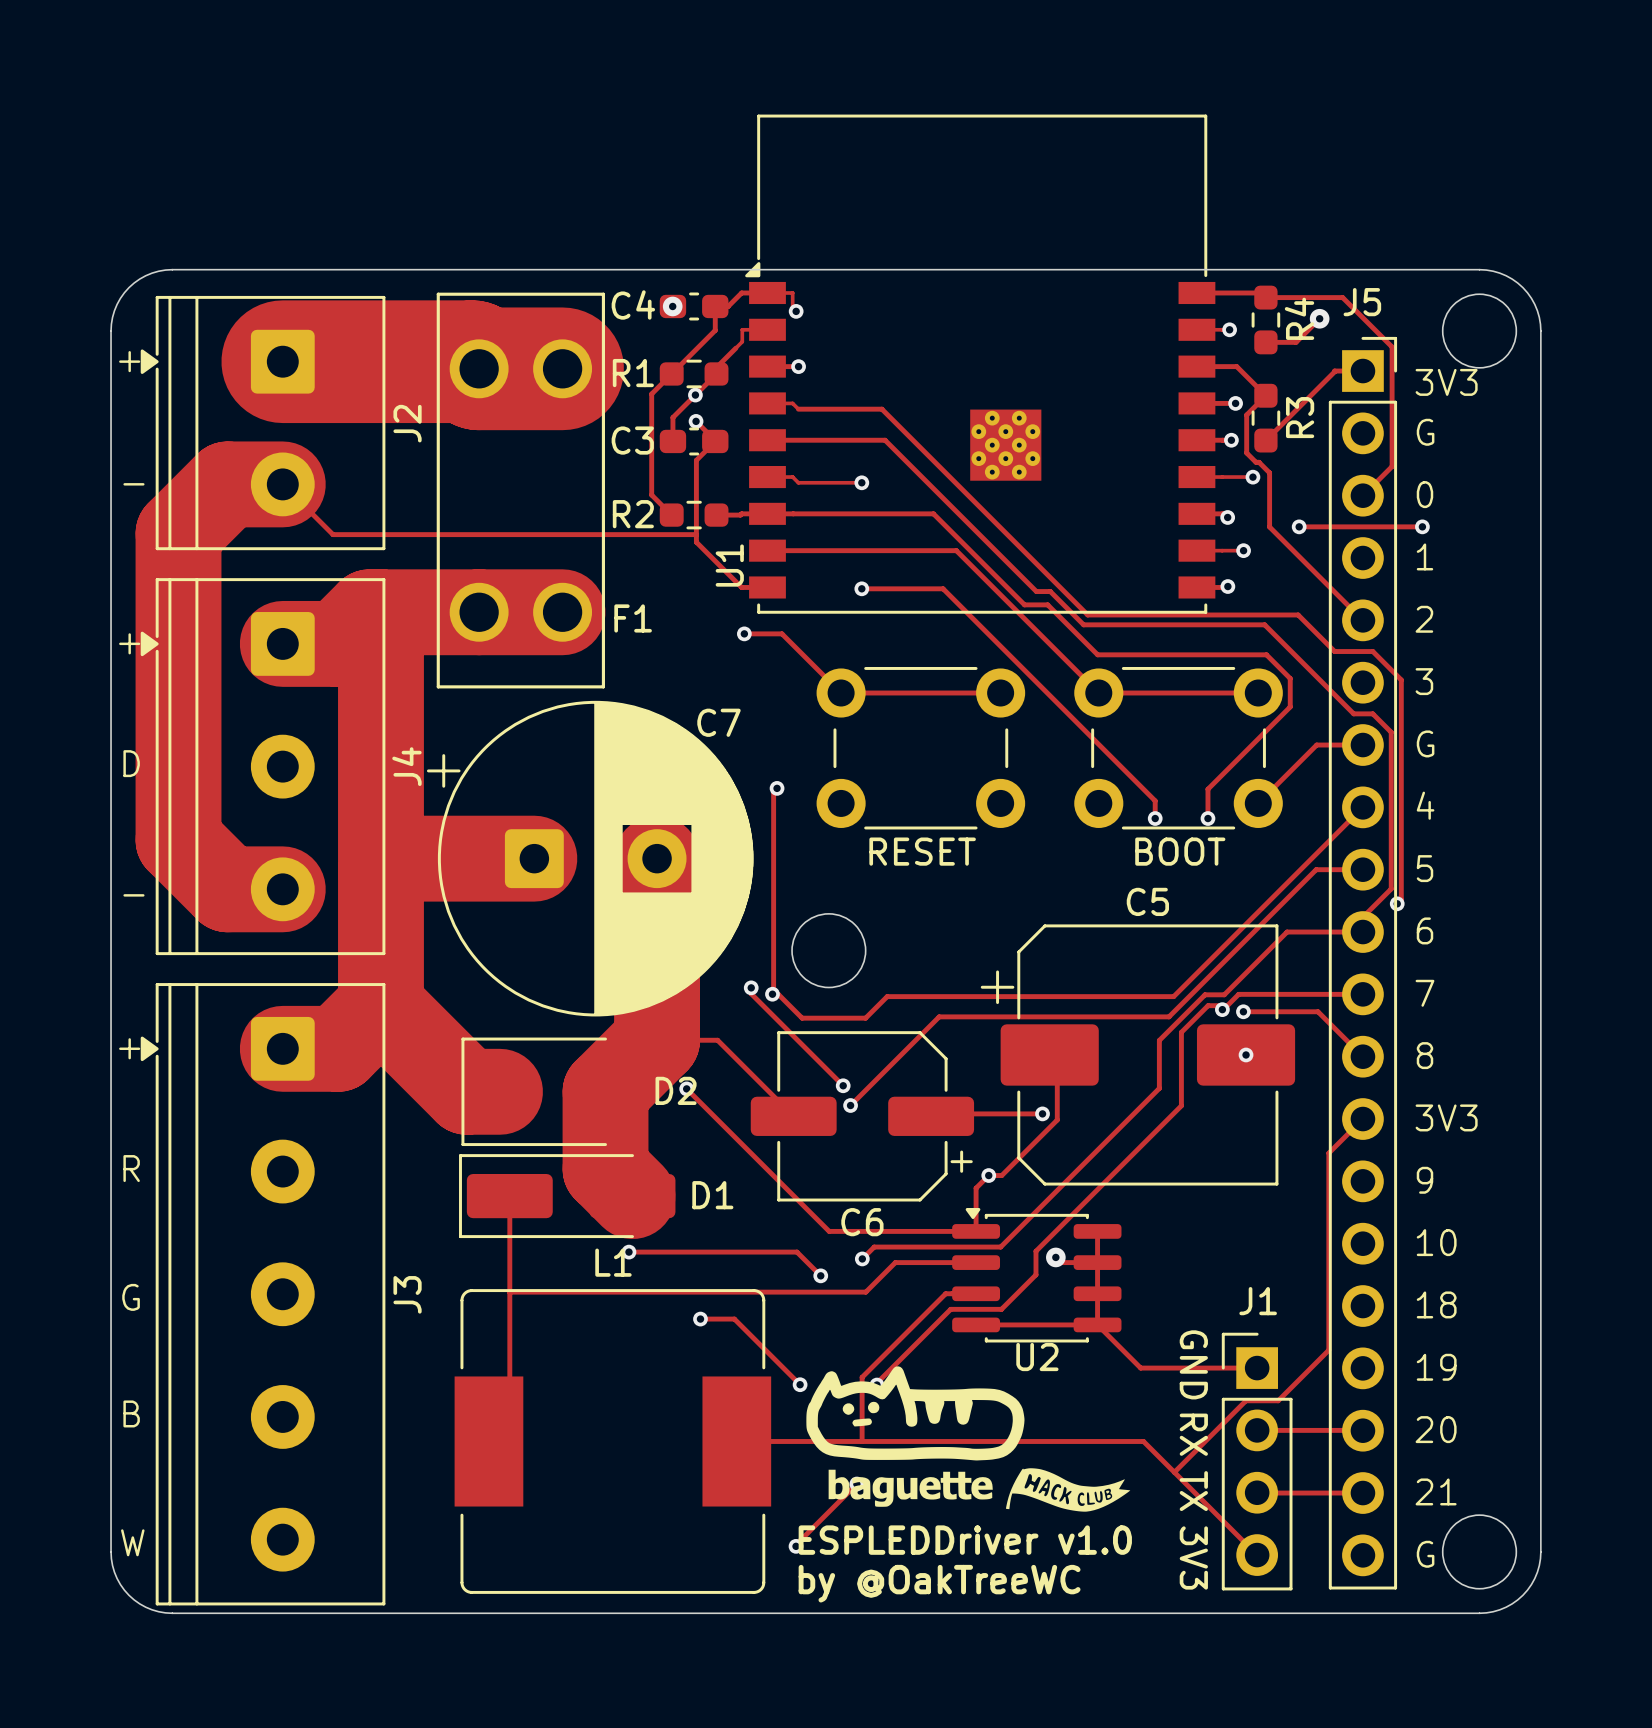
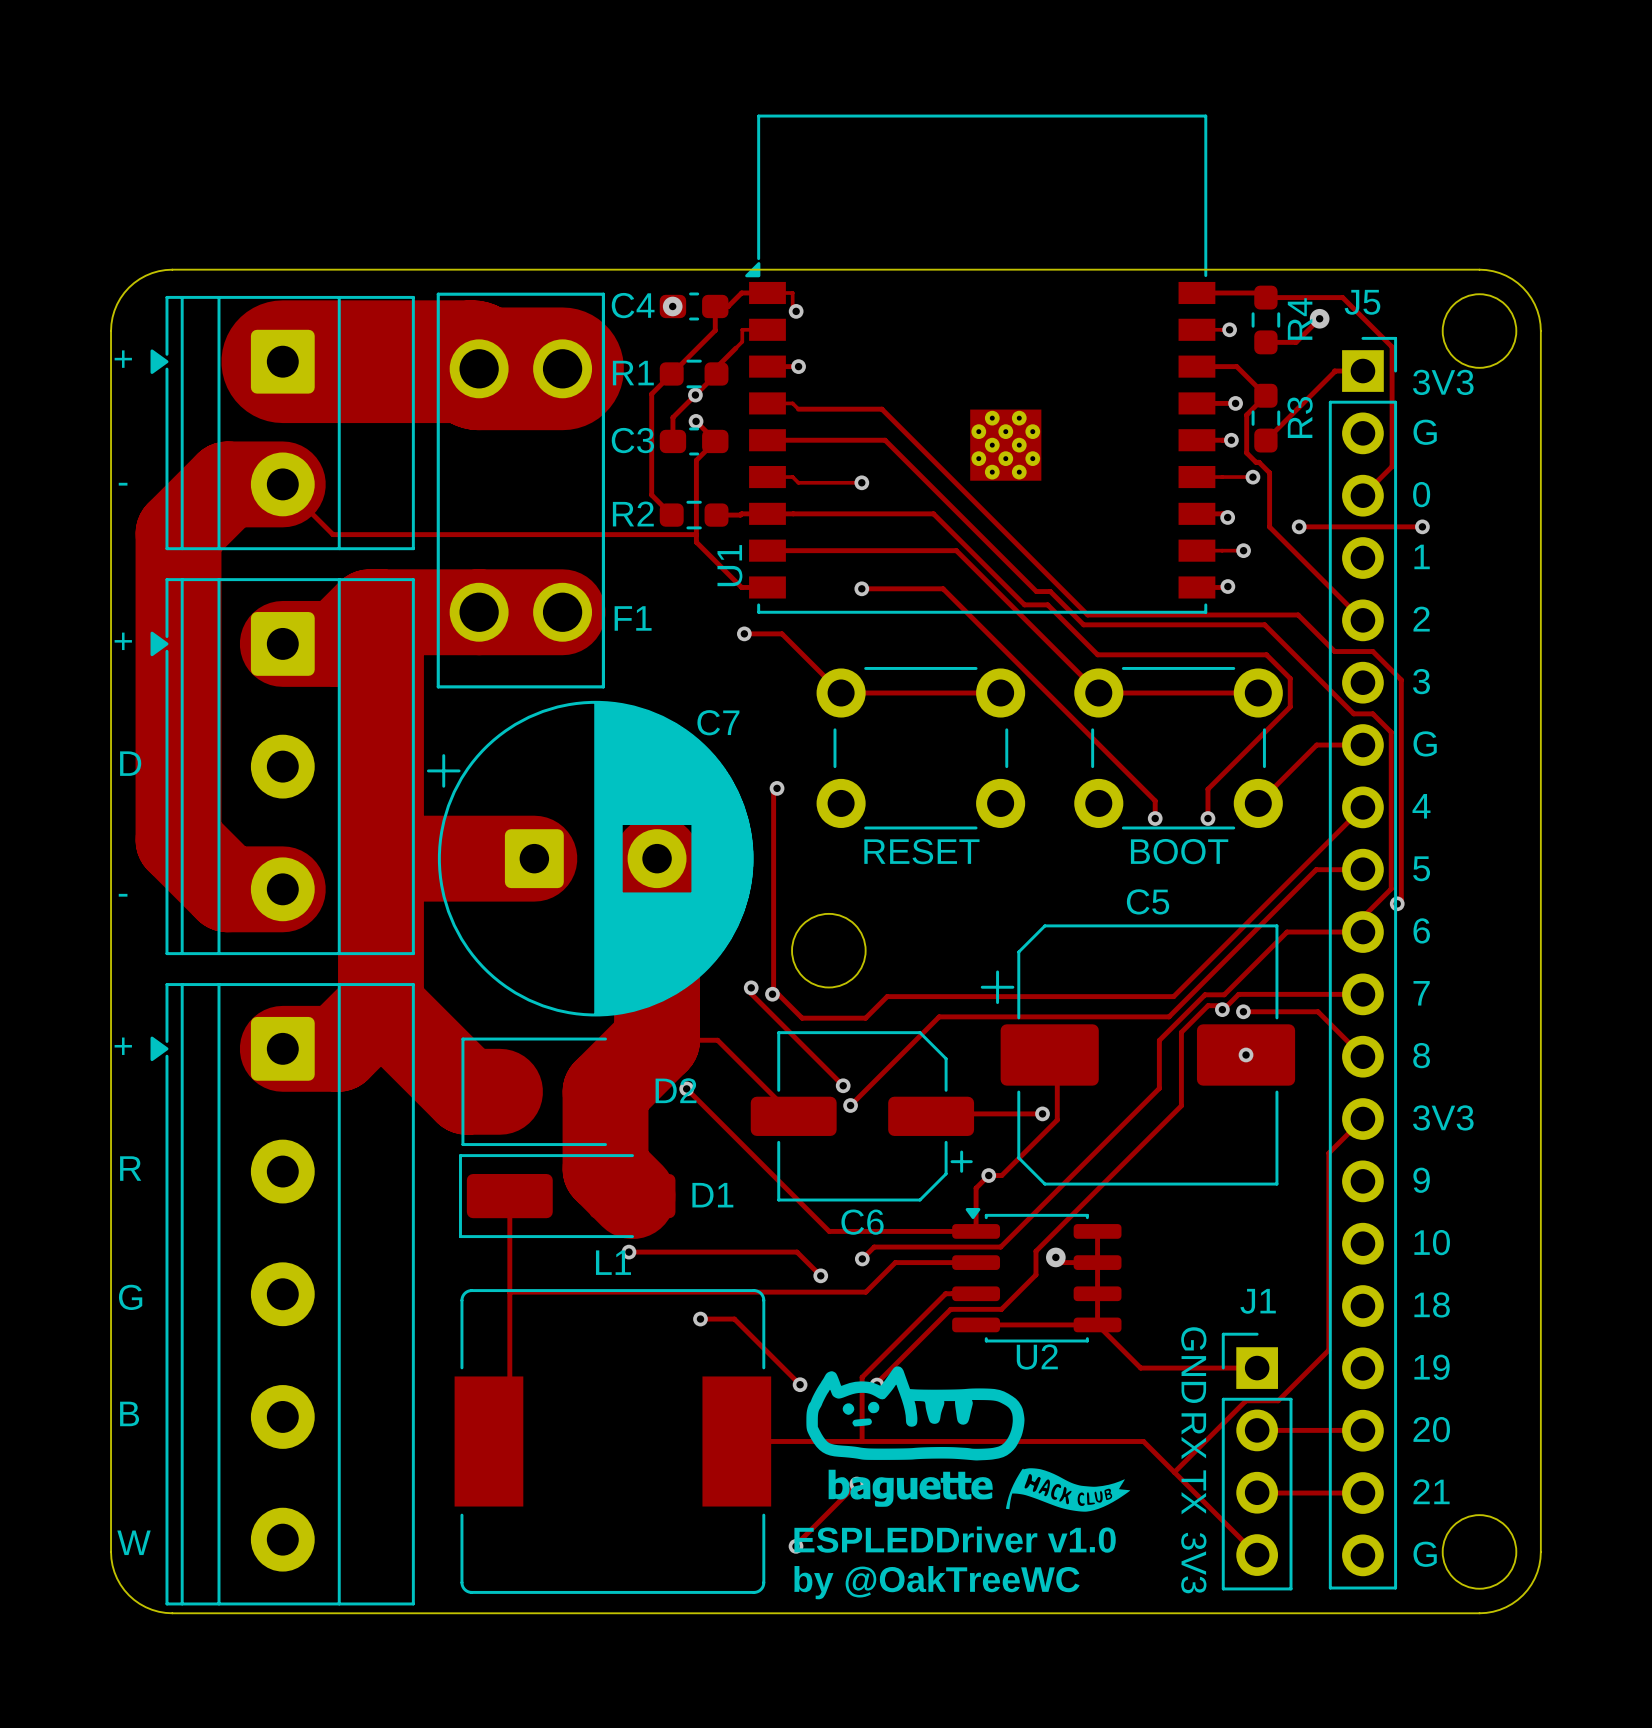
J2: (263, 423) -> none
part: none -> (282, 423)
J4: (263, 766) -> none
part: none -> (282, 766)
J3: (263, 1294) -> none
part: none -> (282, 1294)

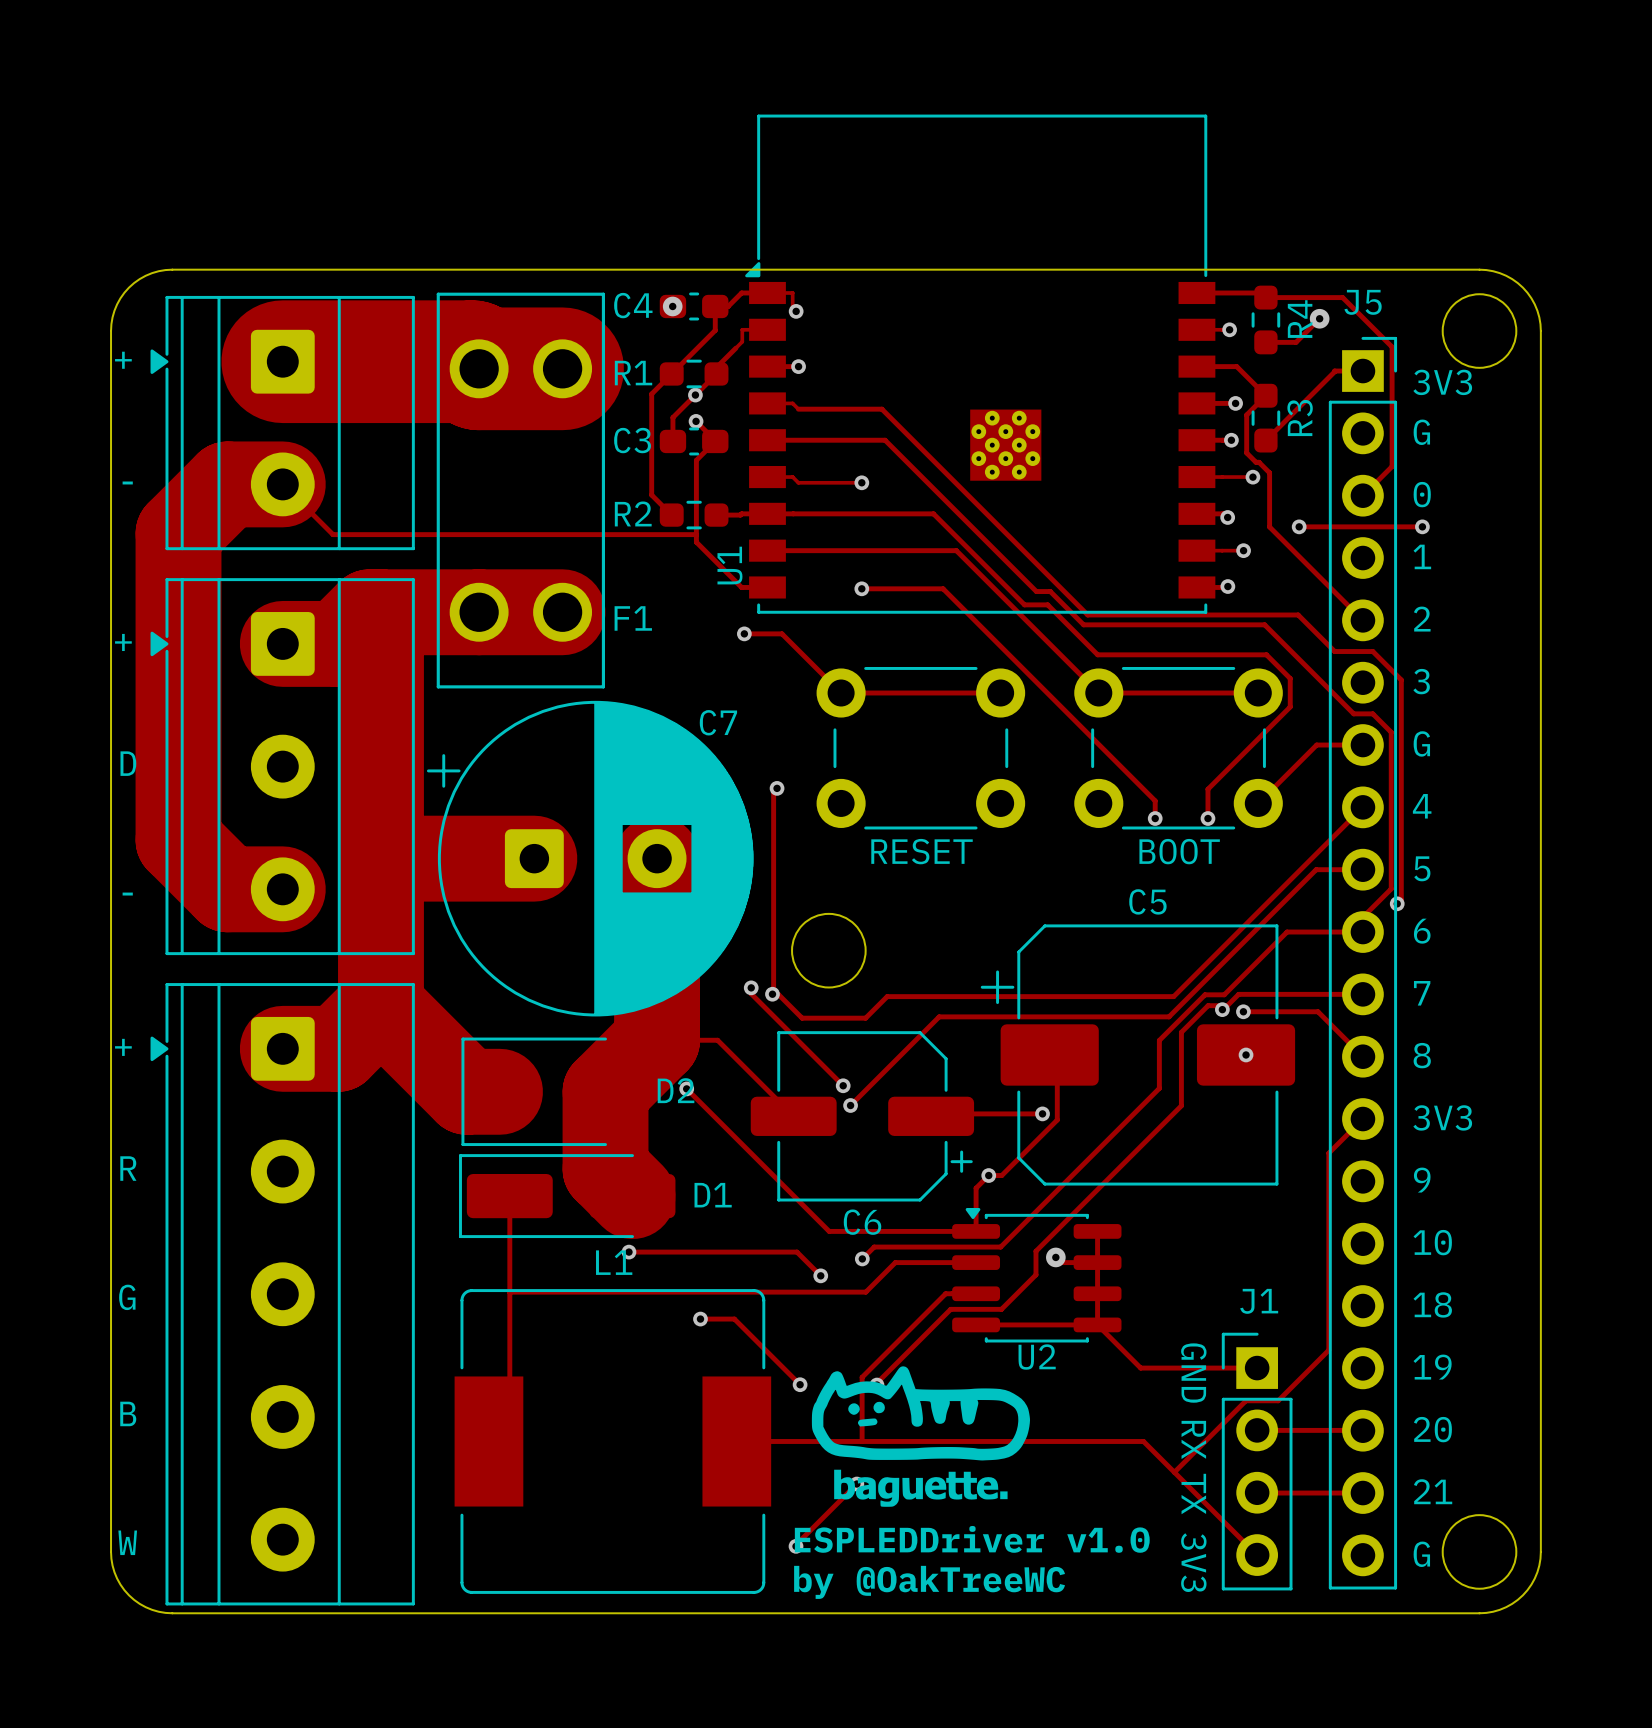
drawing shape: [806, 1366, 1025, 1507] -> [811, 1366, 1031, 1507]
drawing: [1005, 1468, 1131, 1512] -> none

